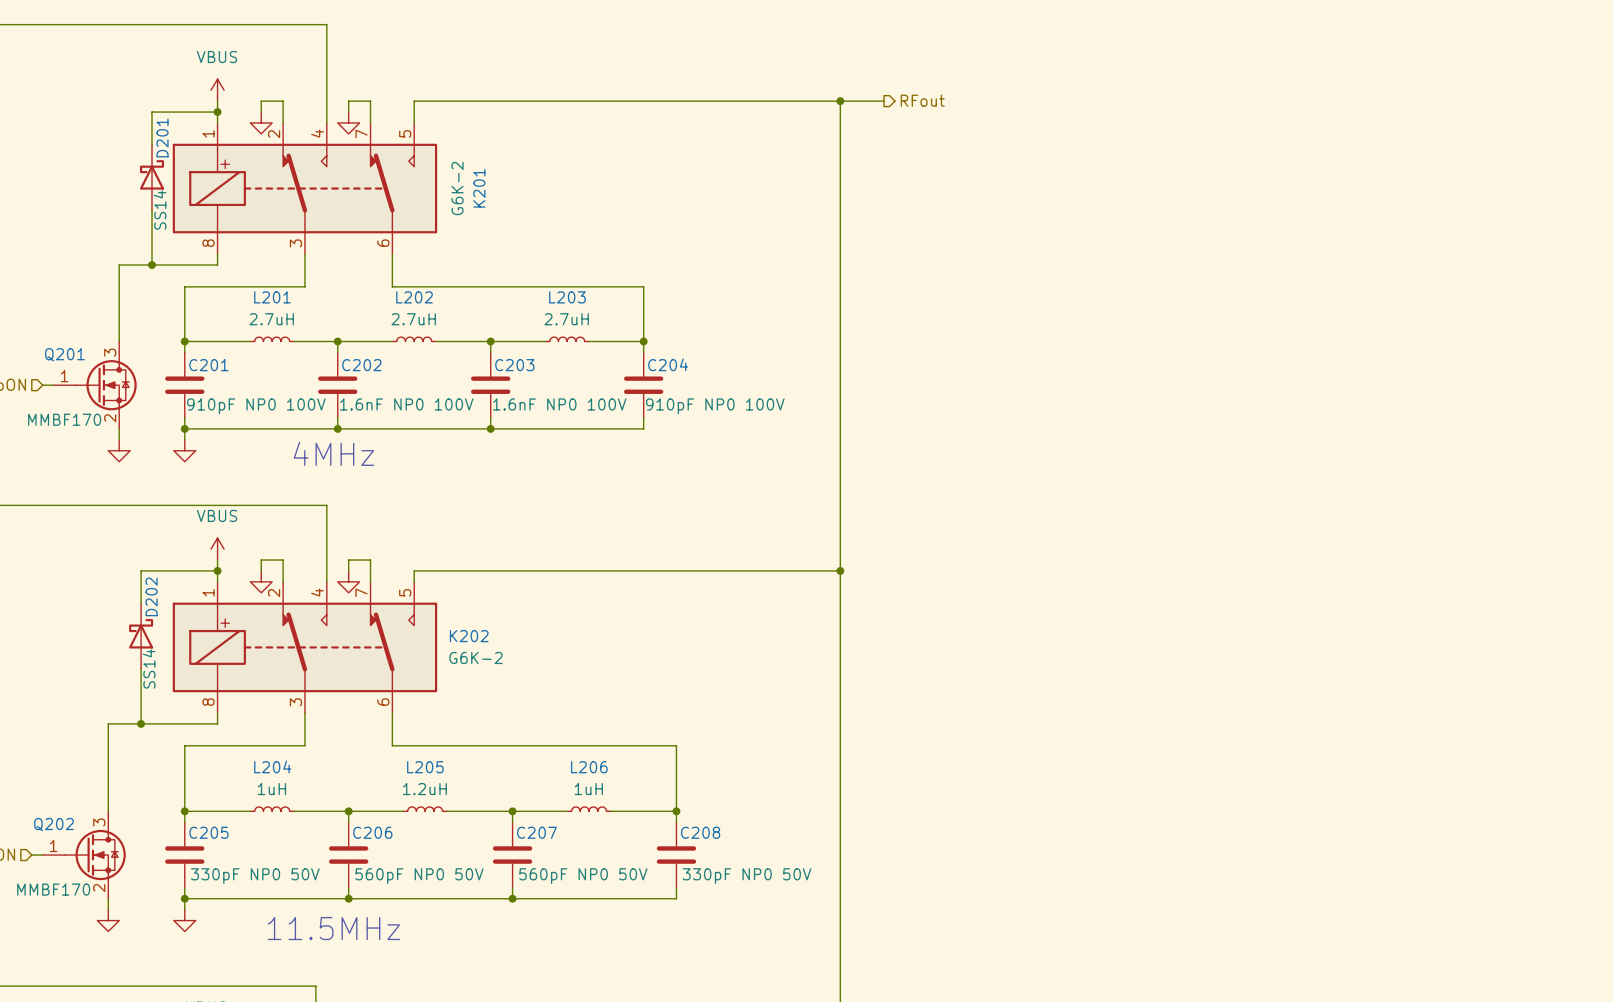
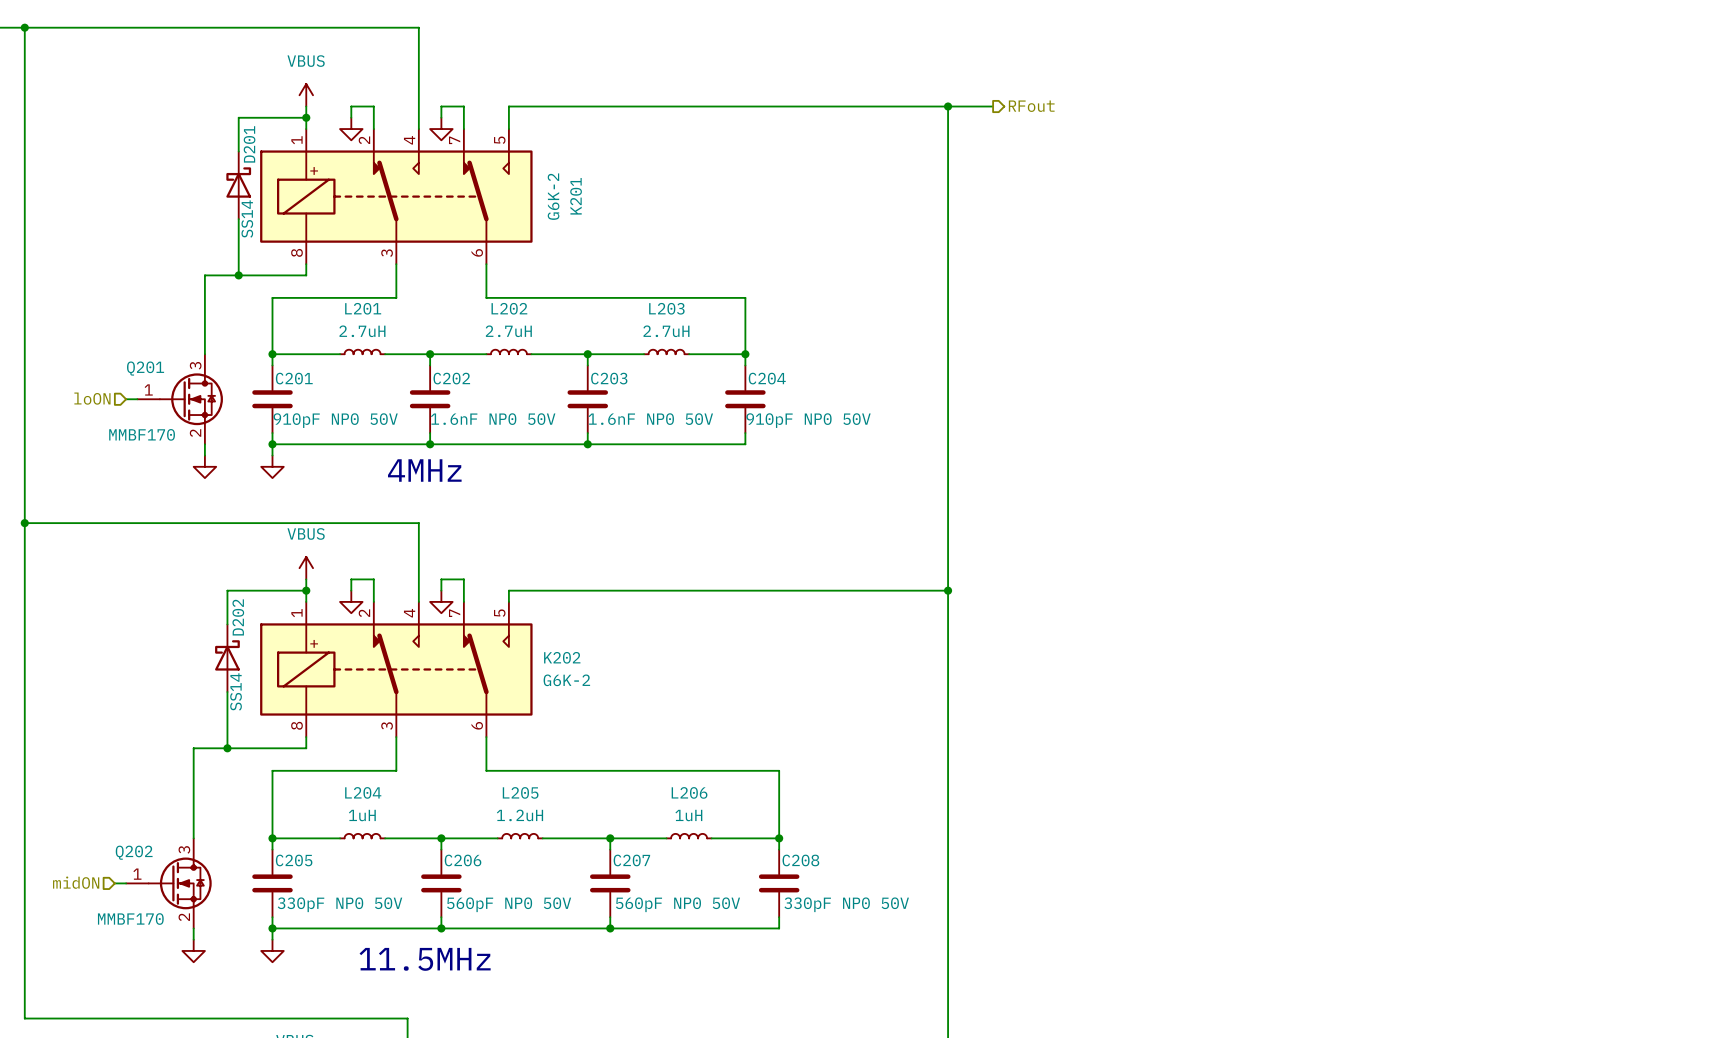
C202 value: 1.6nF NP0 100V (406, 404) -> 1.6nF NP0 50V (493, 419)
C203 value: 1.6nF NP0 100V (559, 404) -> 1.6nF NP0 50V (650, 419)
C201 value: 910pF NP0 100V (256, 406) -> 910pF NP0 50V (335, 420)
C204 value: 910pF NP0 100V (715, 406) -> 910pF NP0 50V (808, 420)

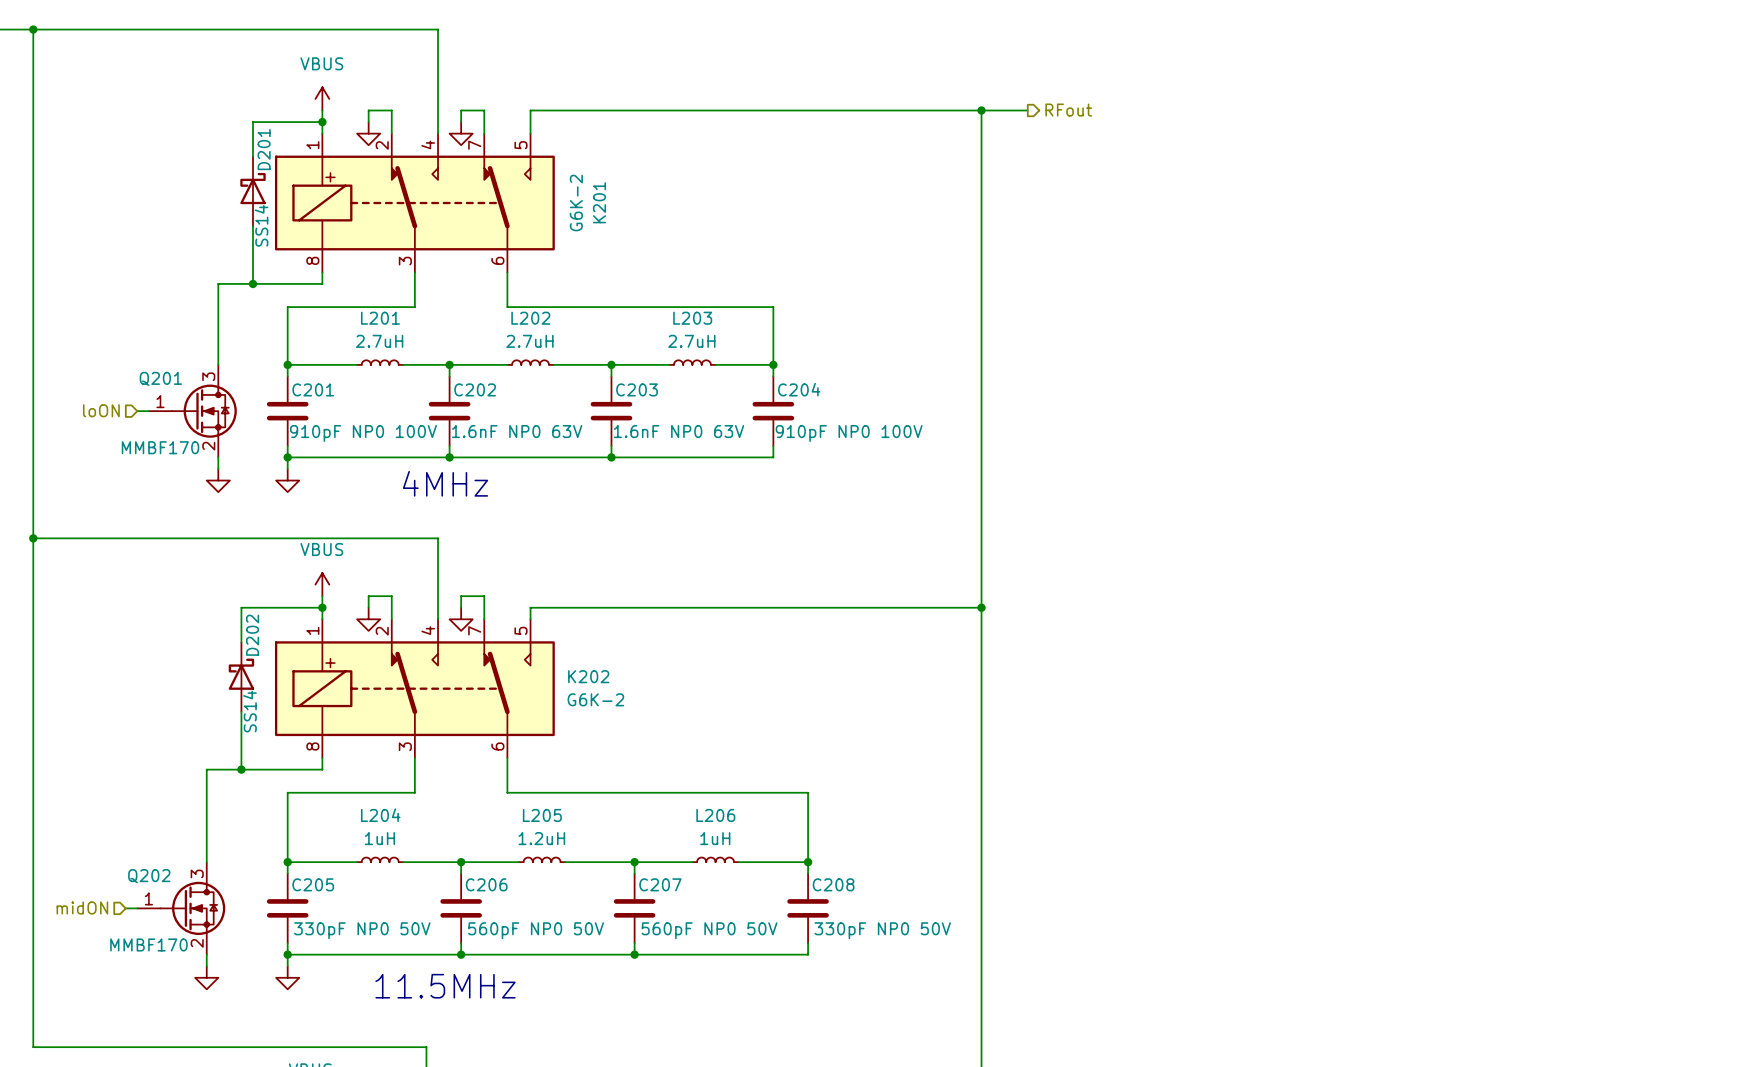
C202 value: 1.6nF NP0 50V (493, 419) -> 1.6nF NP0 63V (517, 431)
C203 value: 1.6nF NP0 50V (650, 419) -> 1.6nF NP0 63V (679, 431)
C201 value: 910pF NP0 50V (335, 420) -> 910pF NP0 100V (363, 433)
C204 value: 910pF NP0 50V (808, 420) -> 910pF NP0 100V (849, 433)

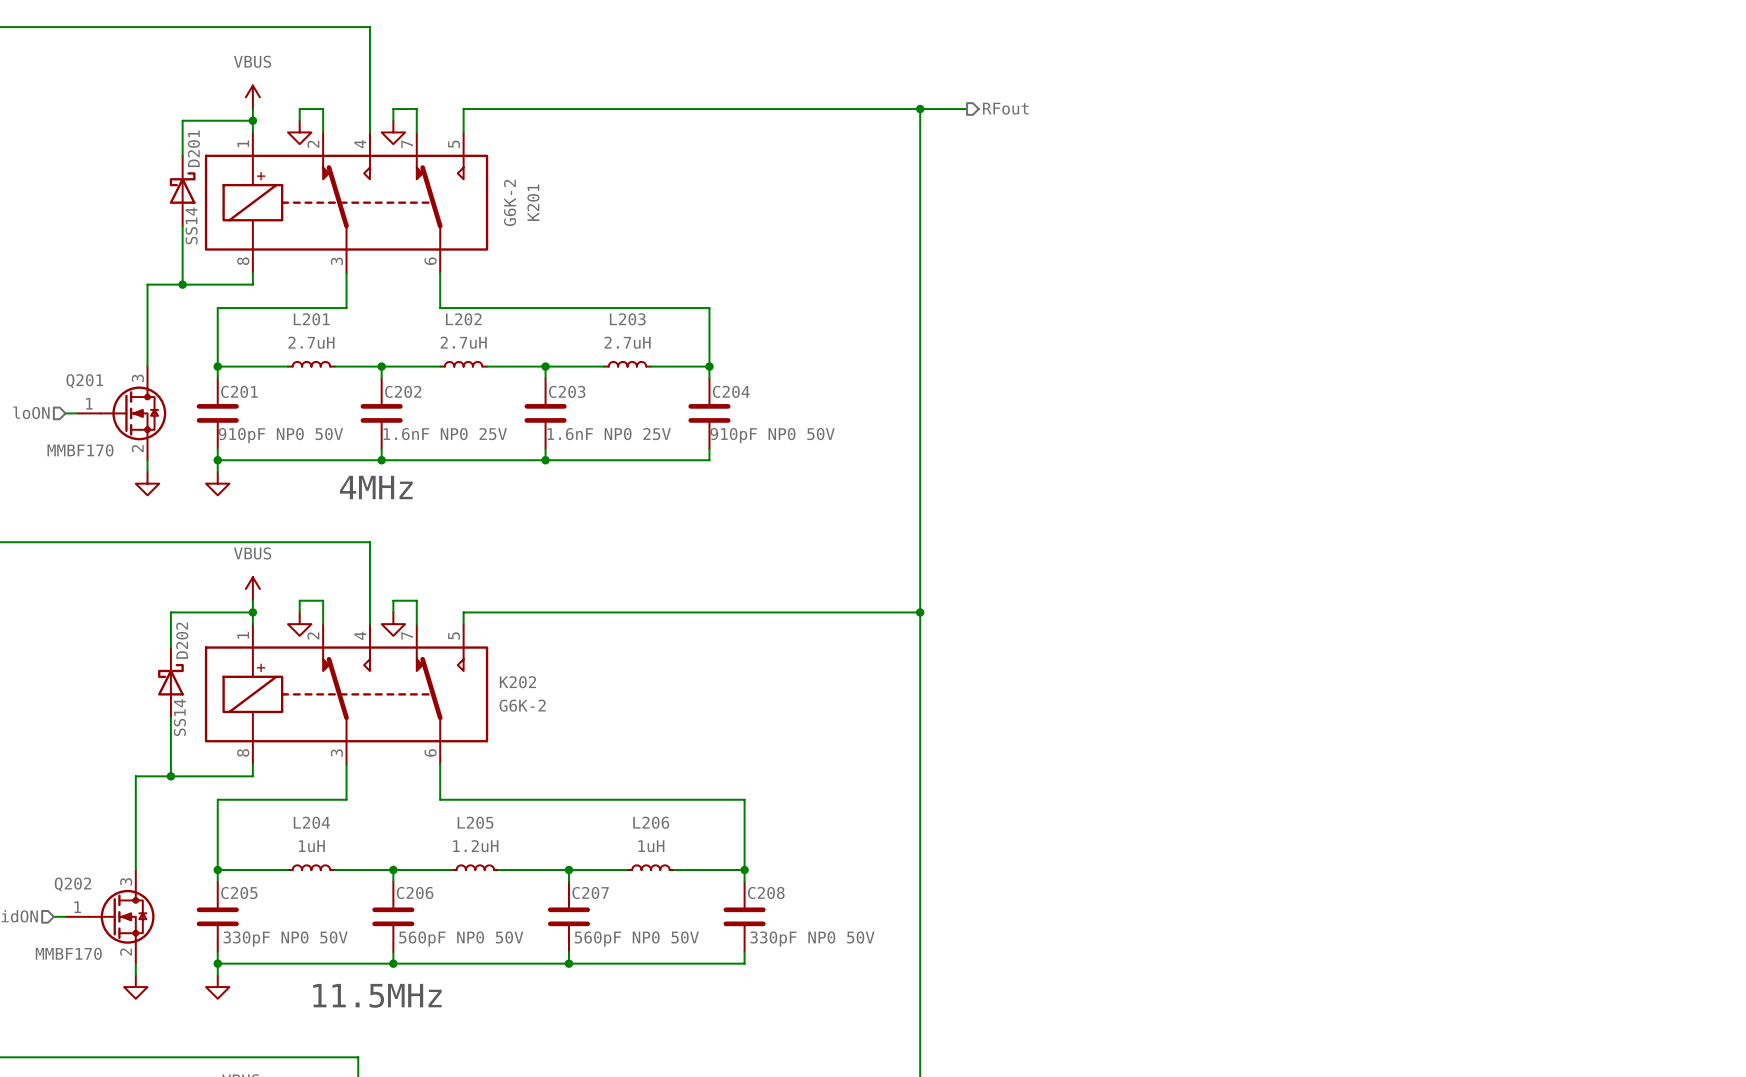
C202 value: 1.6nF NP0 63V (517, 431) -> 1.6nF NP0 25V (445, 434)
C203 value: 1.6nF NP0 63V (679, 431) -> 1.6nF NP0 25V (609, 434)
C201 value: 910pF NP0 100V (363, 433) -> 910pF NP0 50V (280, 435)
C204 value: 910pF NP0 100V (849, 433) -> 910pF NP0 50V (772, 435)

